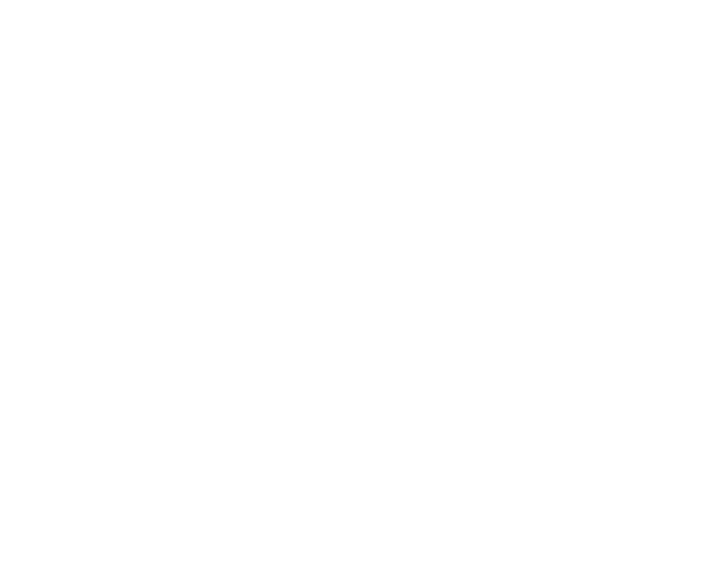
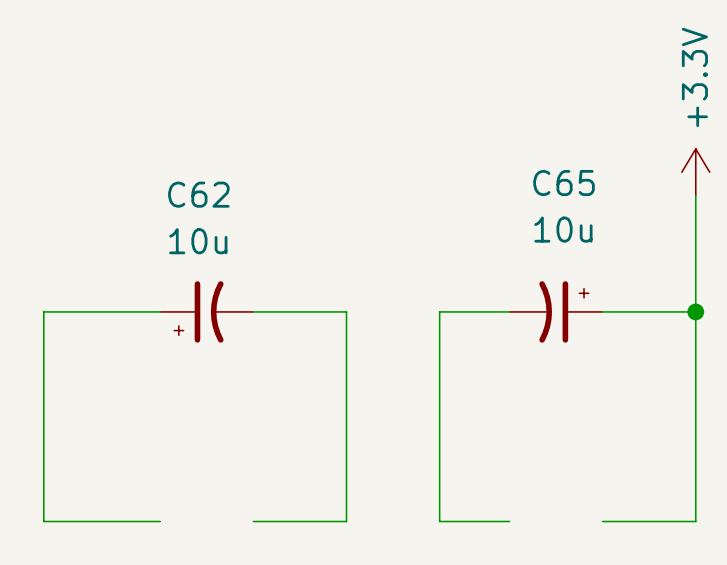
power symbol: none -> +3.3V (695, 172)
wire: none -> (695, 195) (695, 521) (602, 521)
wire: none -> (160, 311) (43, 311) (43, 521) (160, 521)
C62: none -> 10u (206, 311)
wire: none -> (253, 311) (346, 311) (346, 521) (253, 521)
wire: none -> (509, 311) (439, 311) (439, 521) (509, 521)
C65: none -> 10u (556, 311)
wire: none -> (602, 311) (695, 311)
junction: none -> (695, 311)

